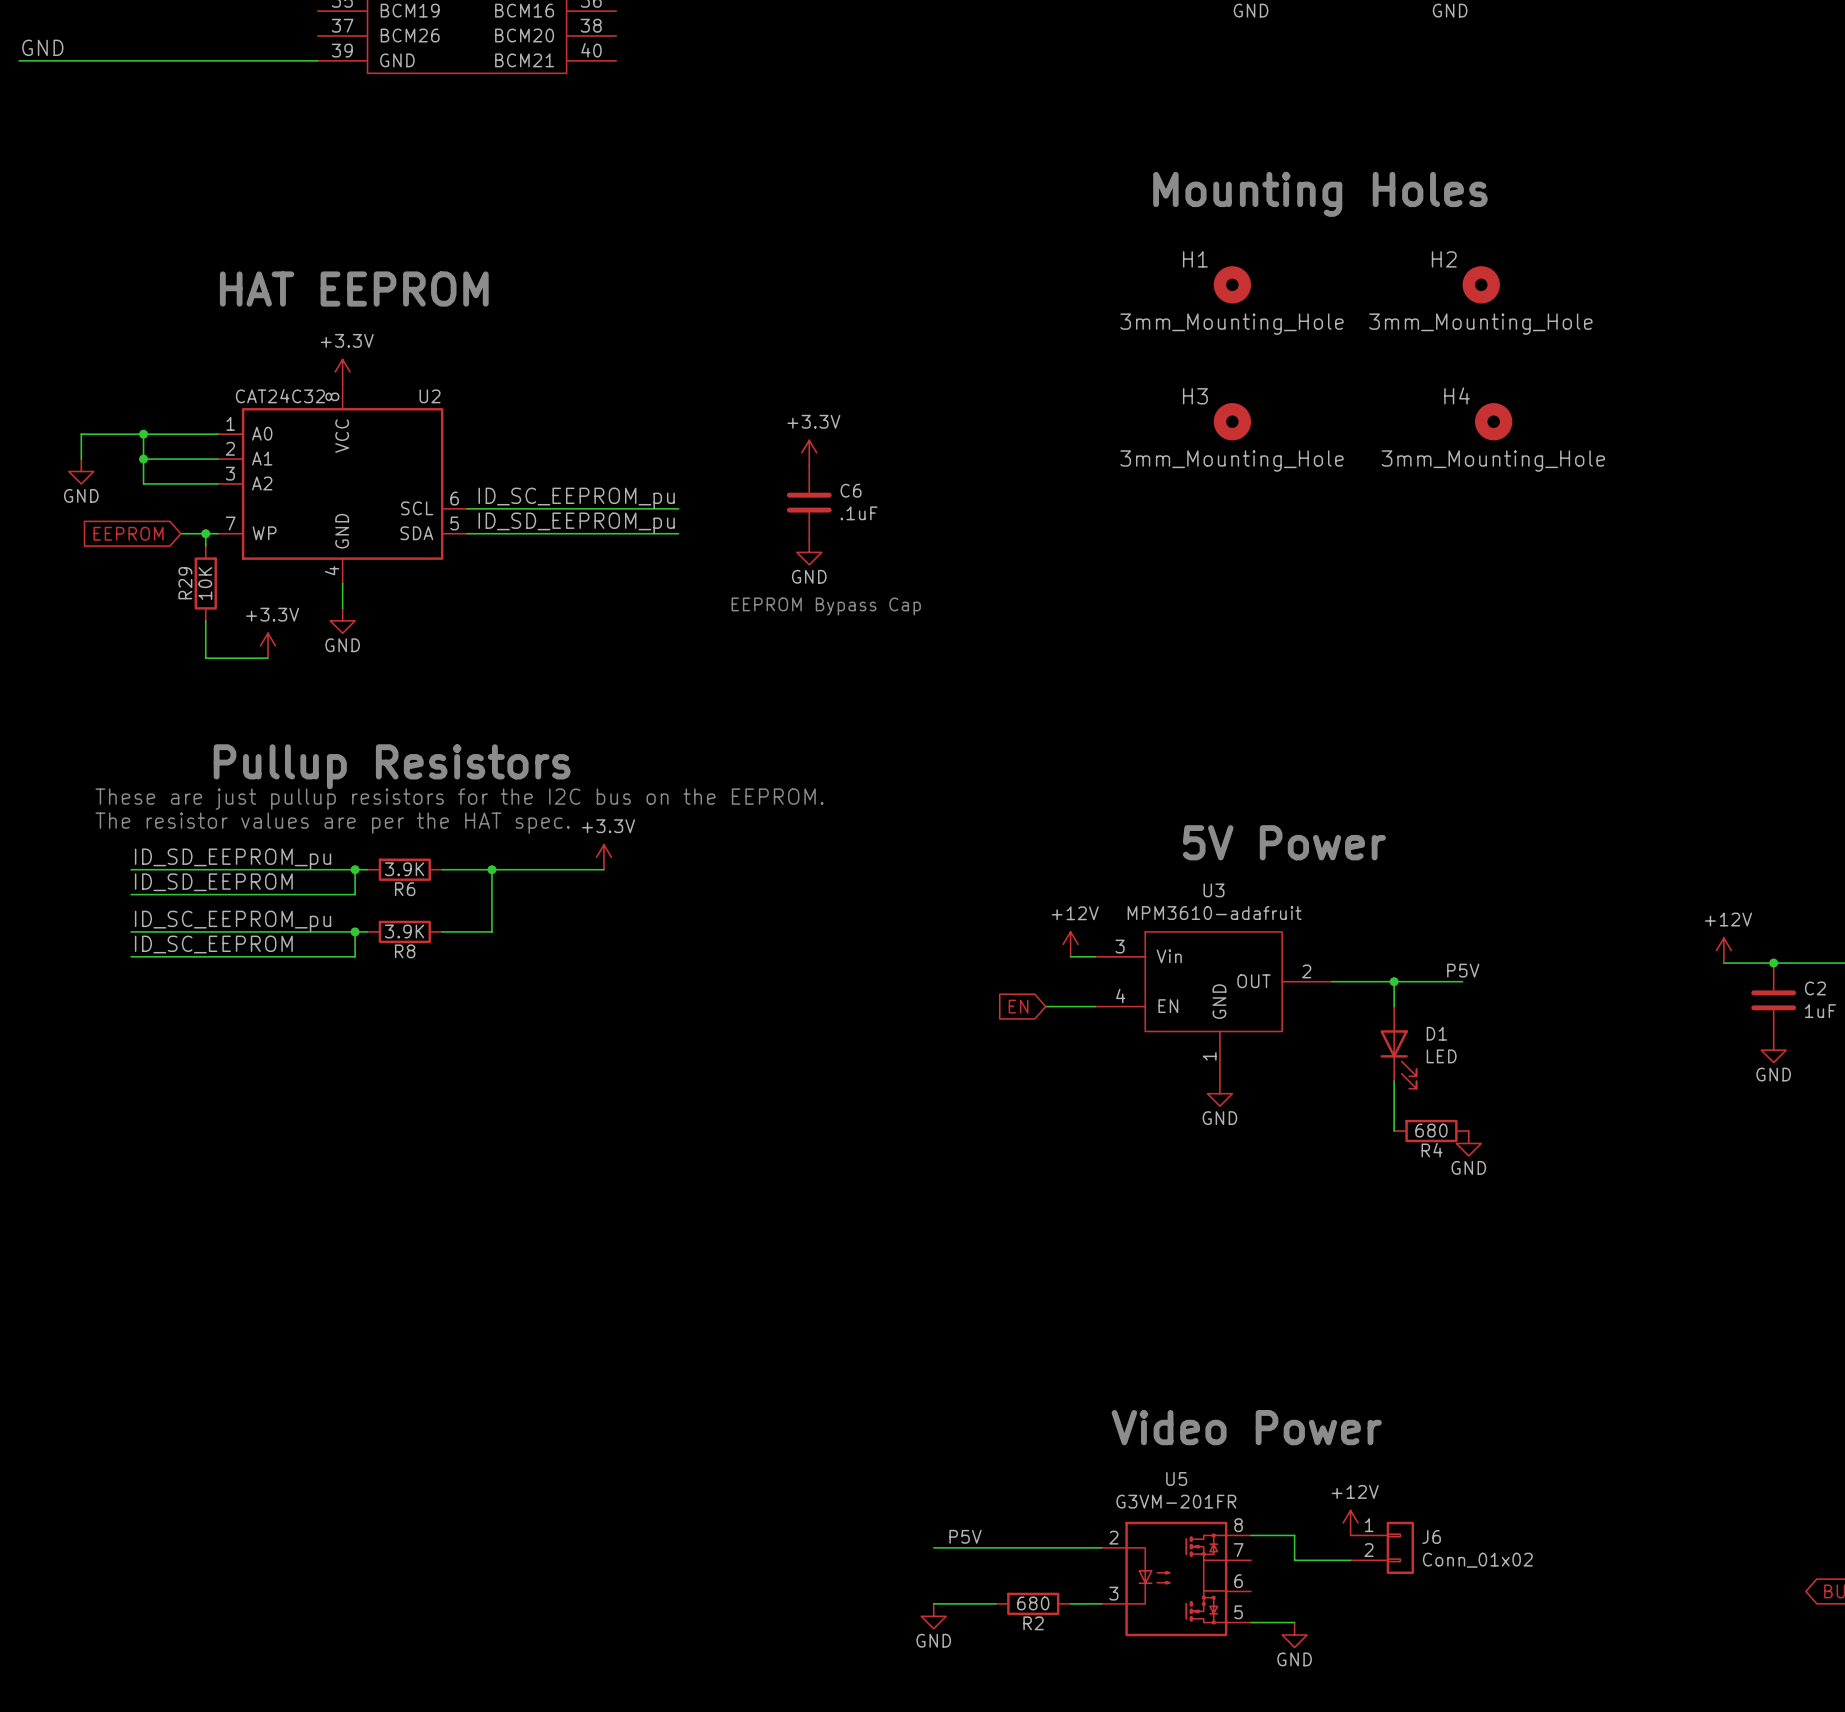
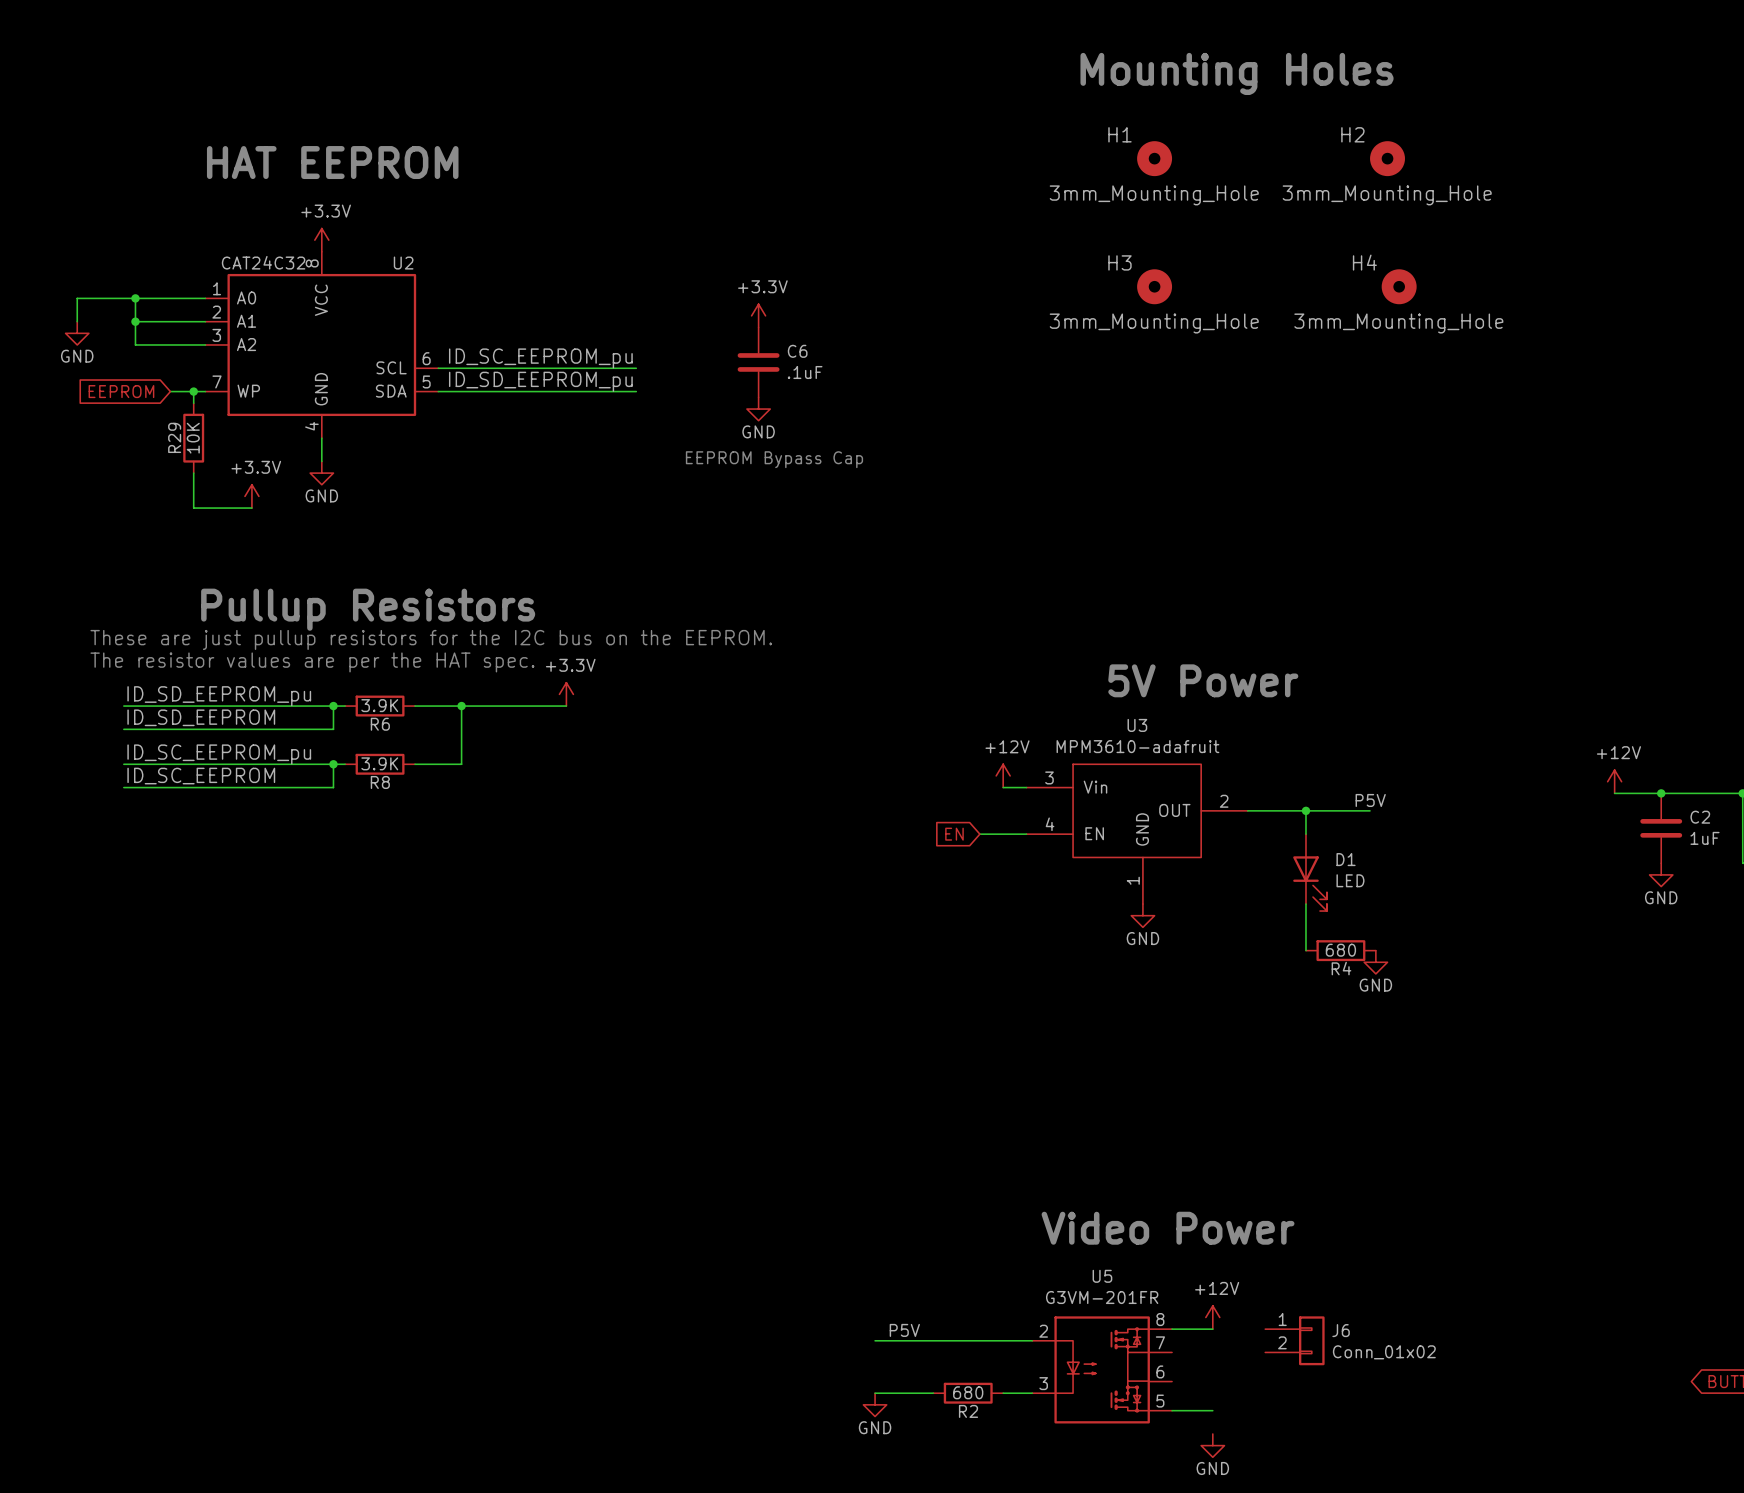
power symbol position: +12V (1350, 1523) -> +12V (1212, 1317)
wire: (1294, 1535) (1294, 1560) (1350, 1560) -> none
power symbol position: GND (1294, 1635) -> GND (1212, 1445)

